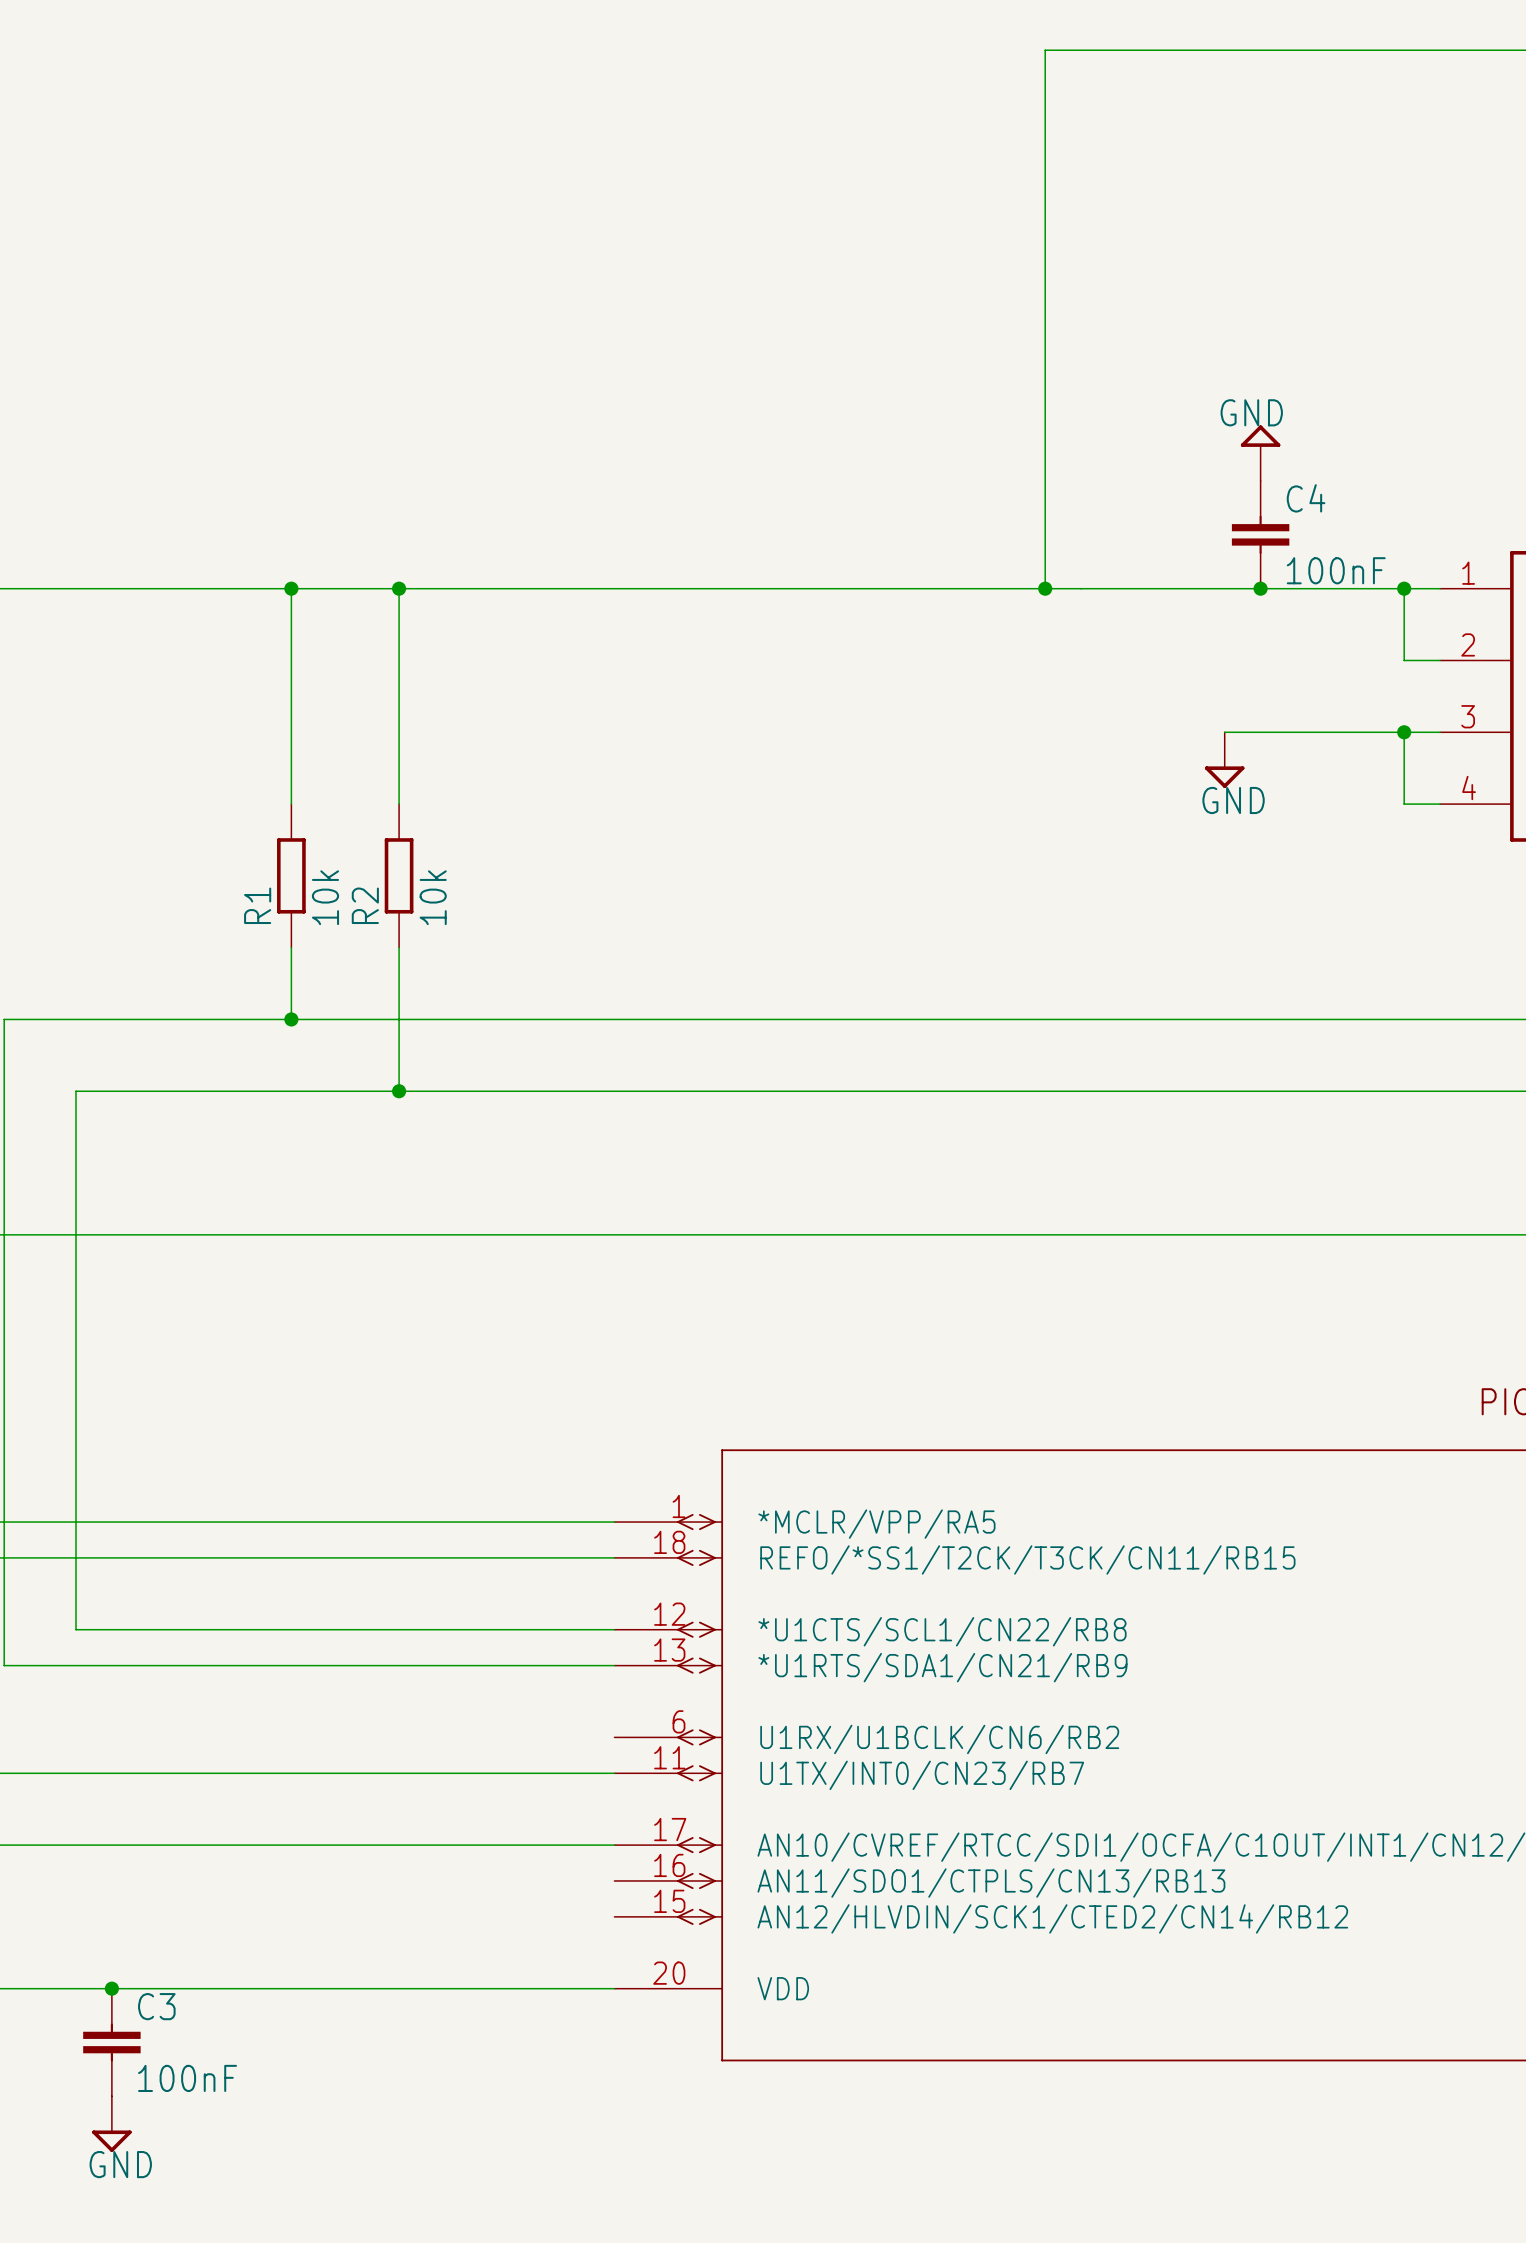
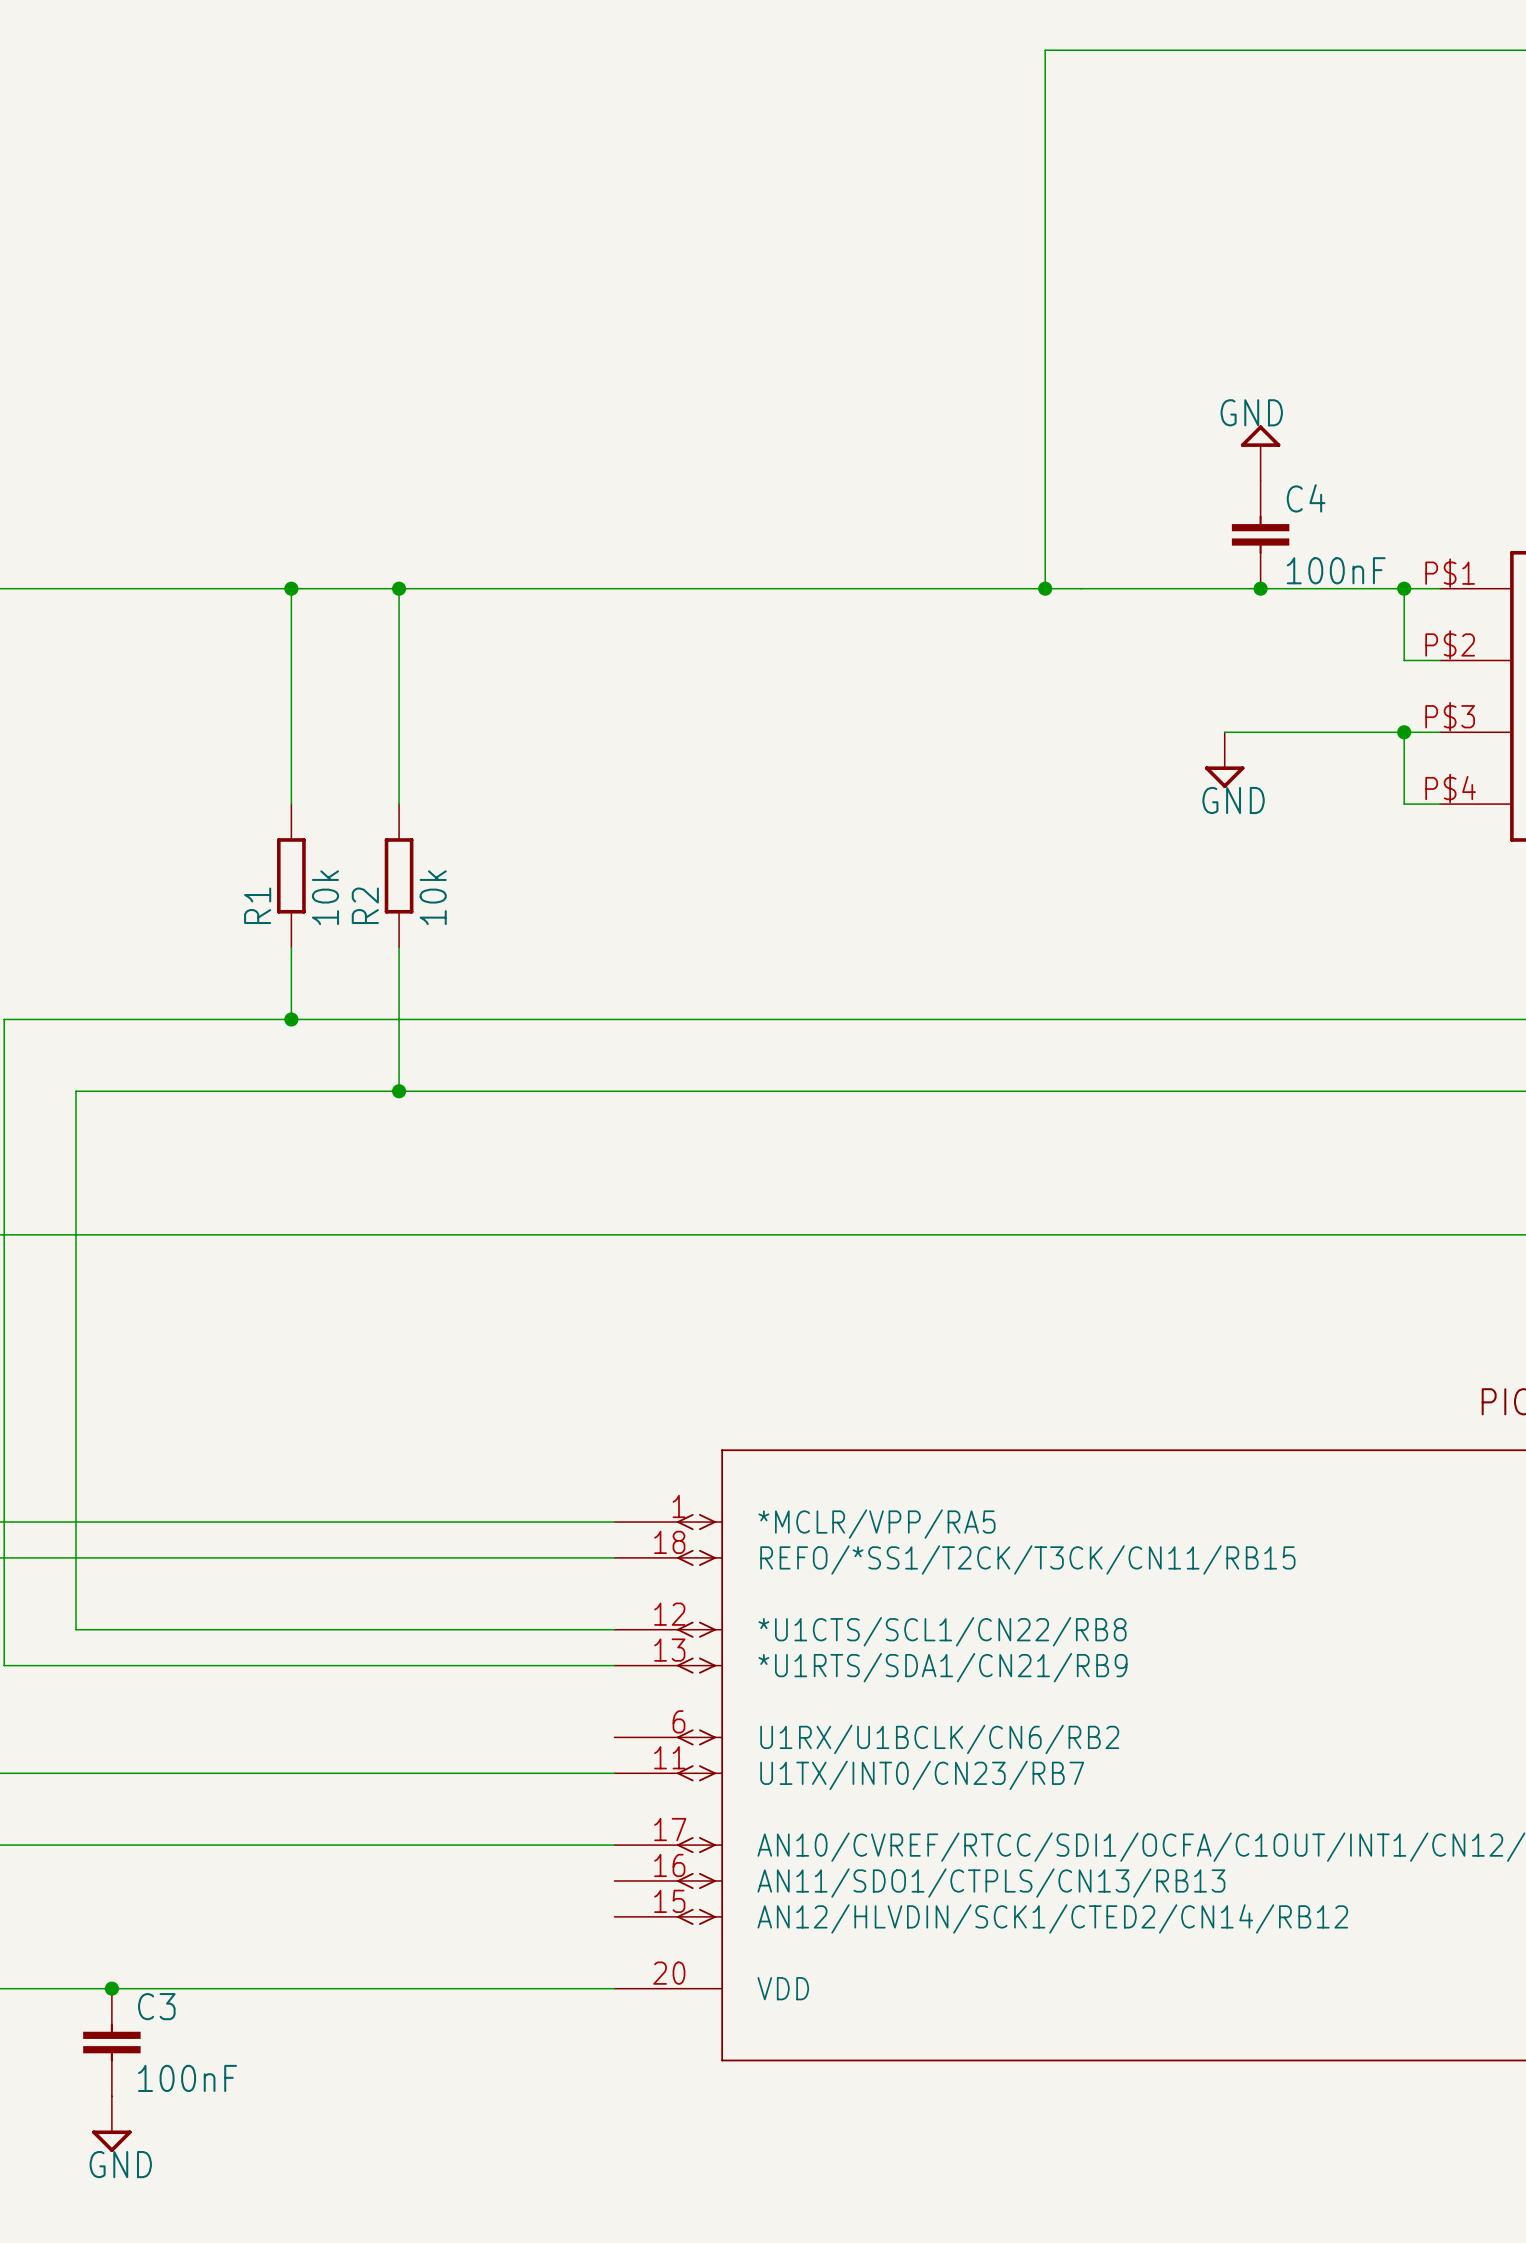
part pin number: 1 (1468, 573) -> P$1 (1450, 573)
part pin number: 2 (1468, 644) -> P$2 (1450, 644)
part pin number: 3 (1468, 716) -> P$3 (1450, 716)
part pin number: 4 (1469, 788) -> P$4 (1450, 788)

